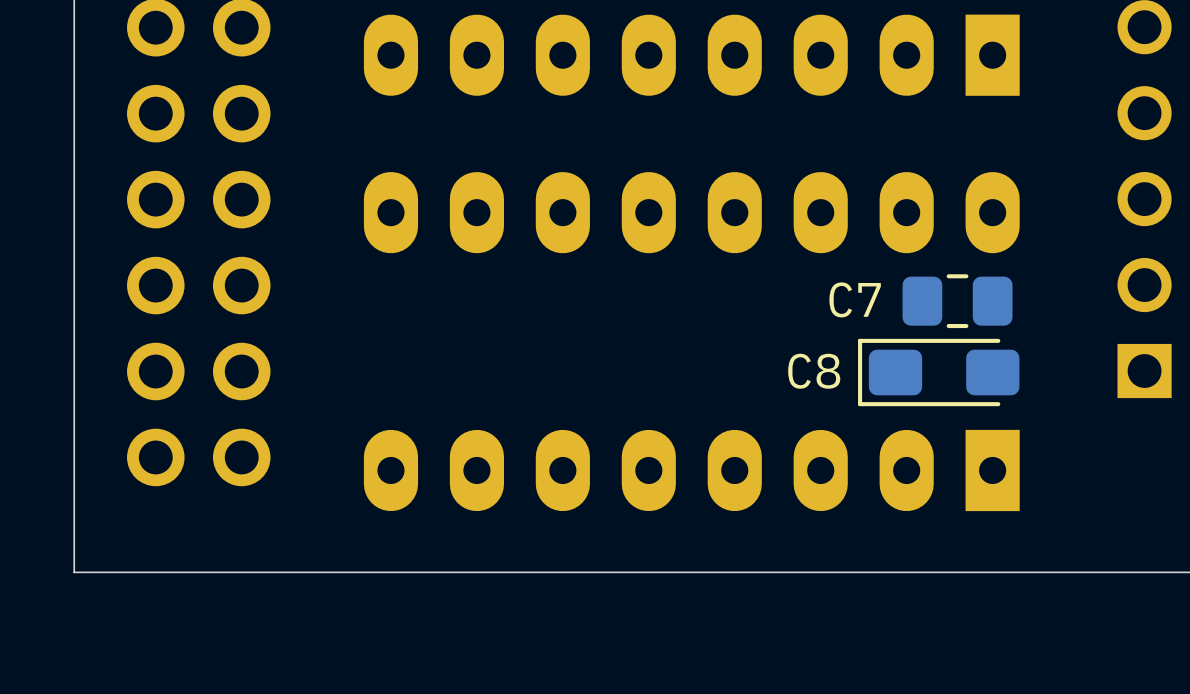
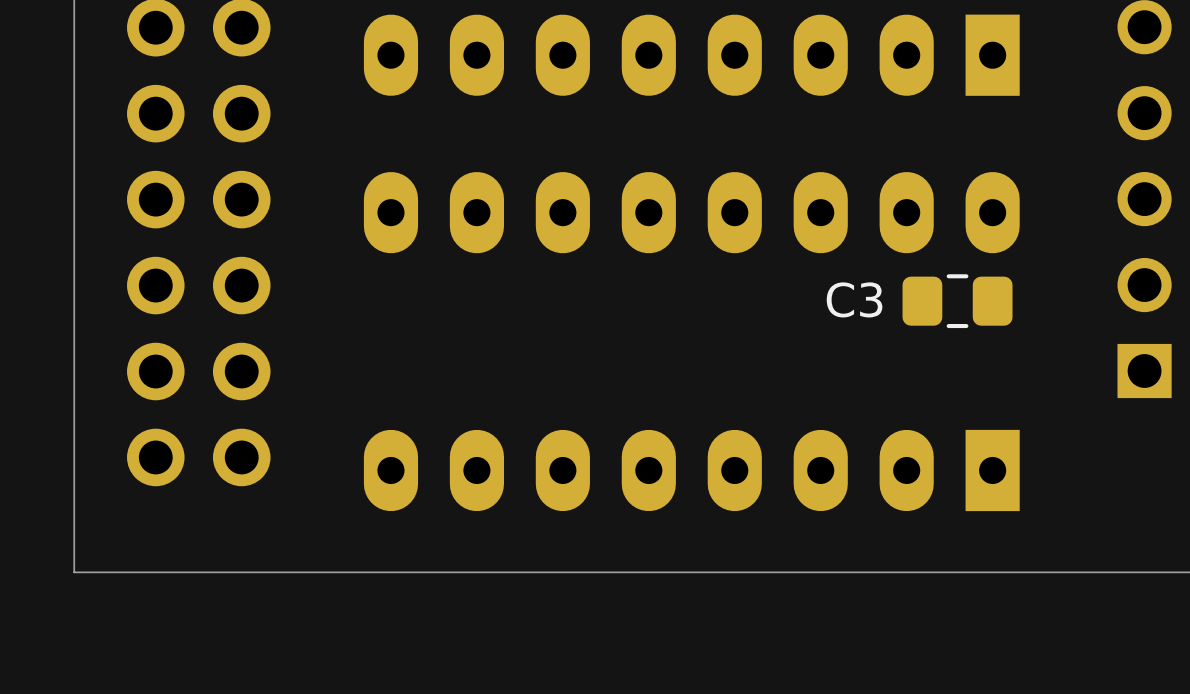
C7 name: C7 (855, 299) -> C3 (854, 299)
C8: (938, 372) -> none

